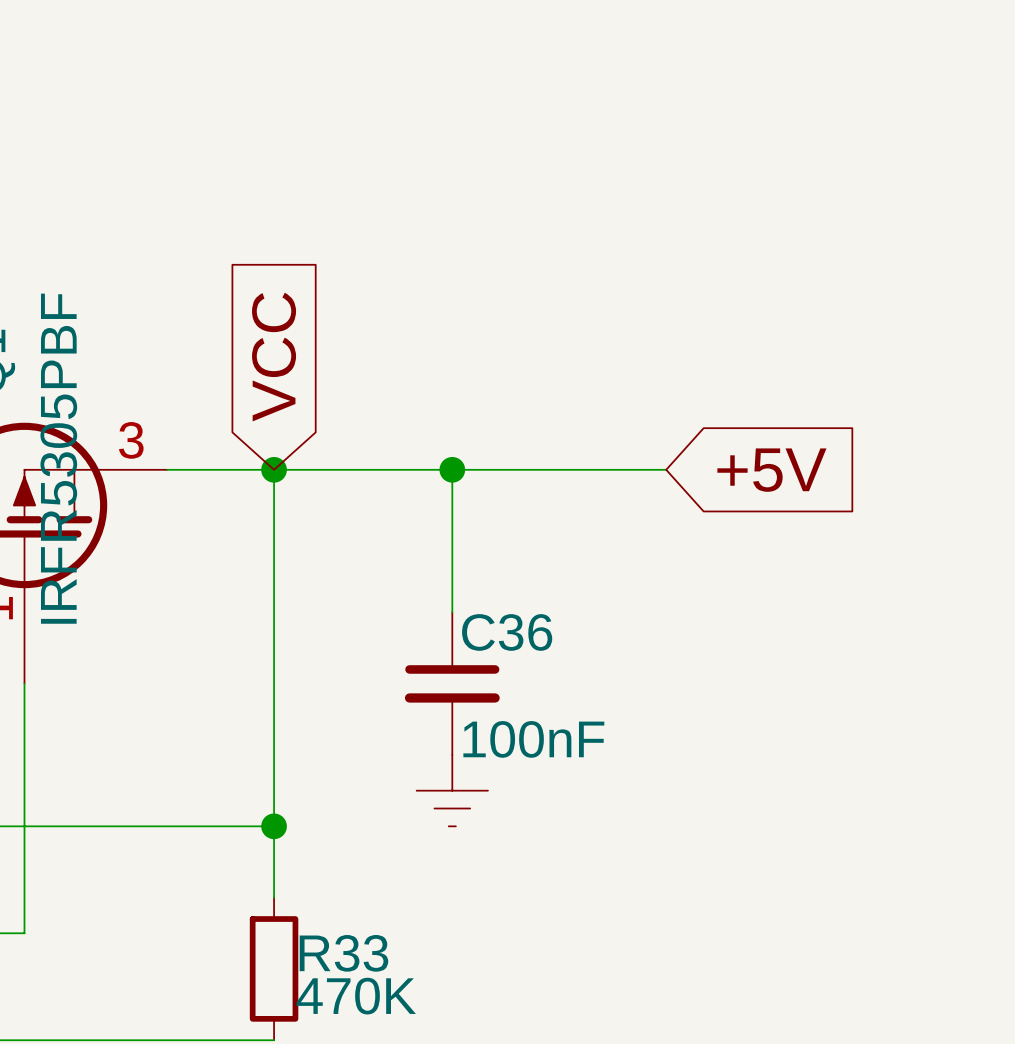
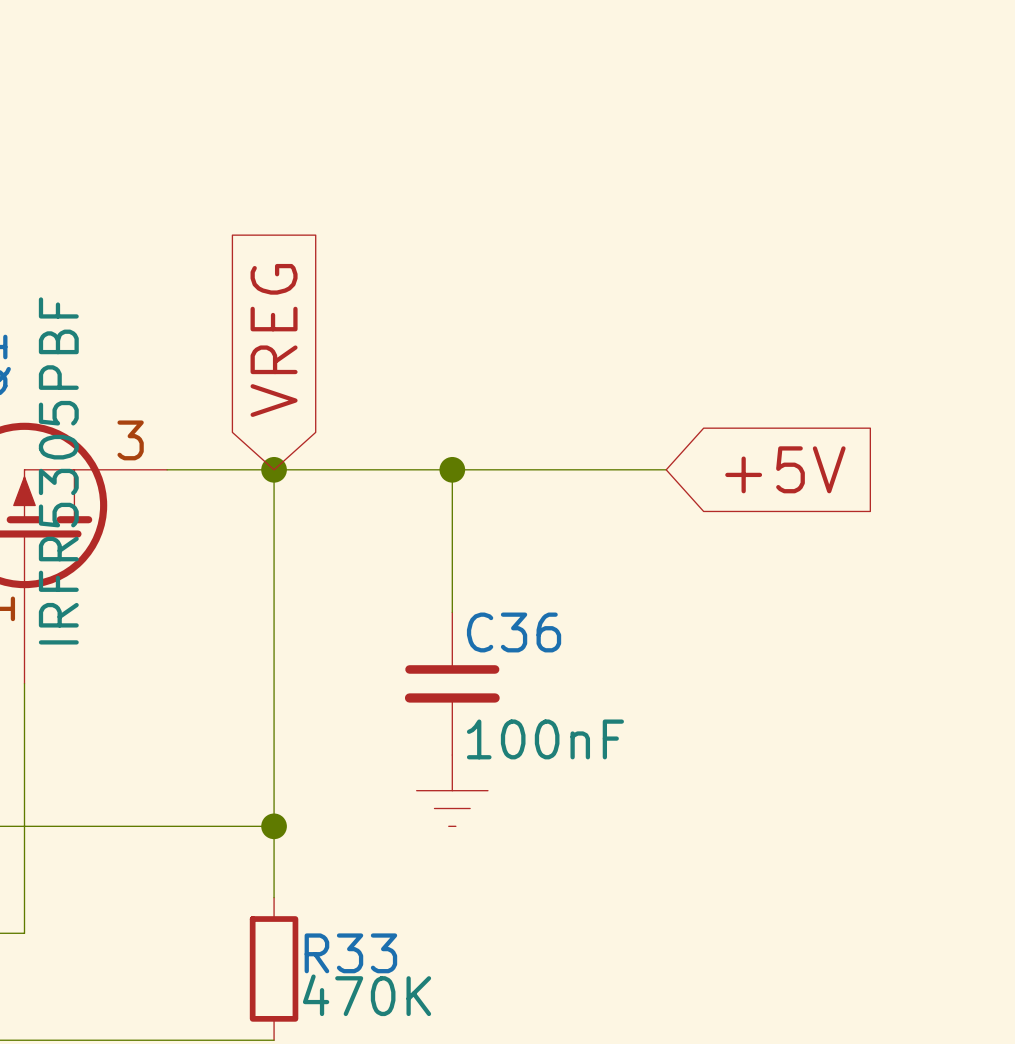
global label: VCC (274, 357) -> VREG (274, 340)

